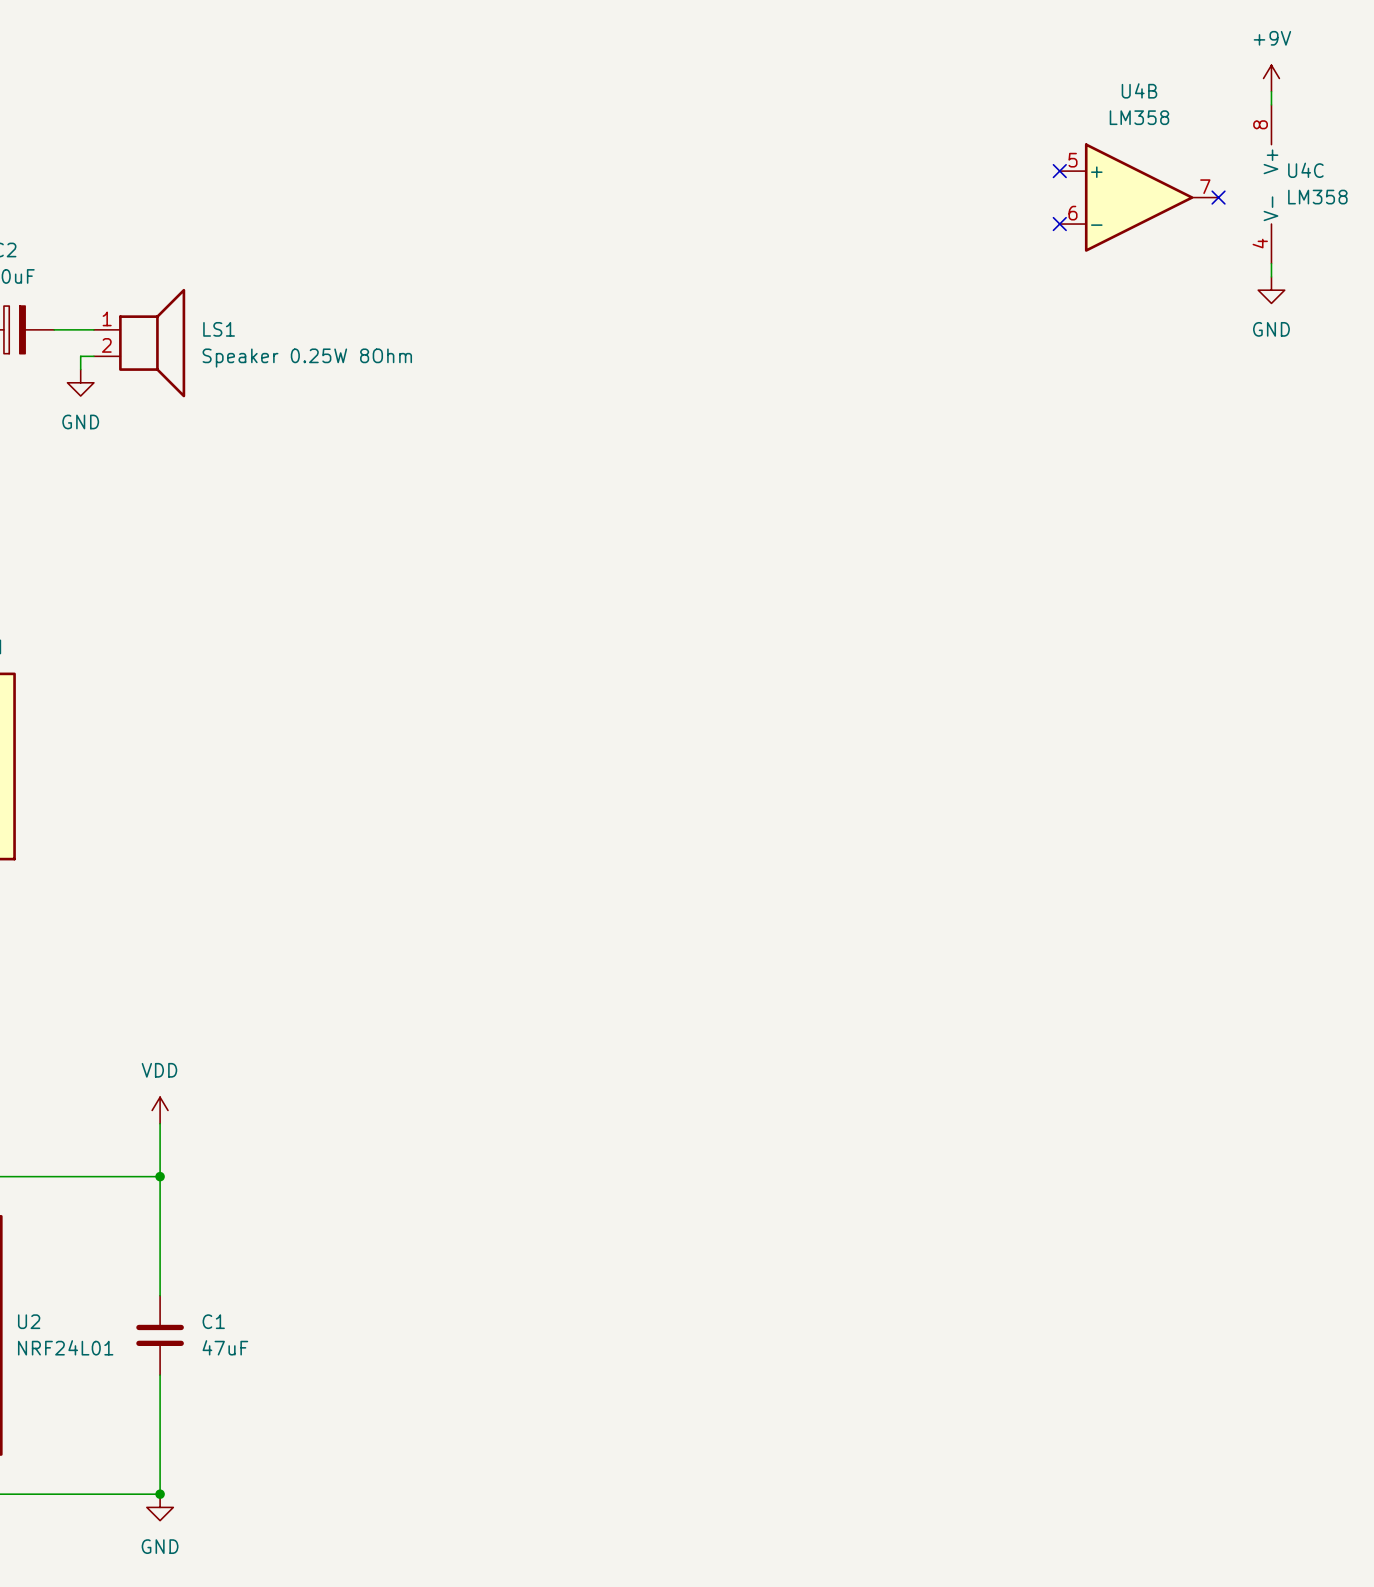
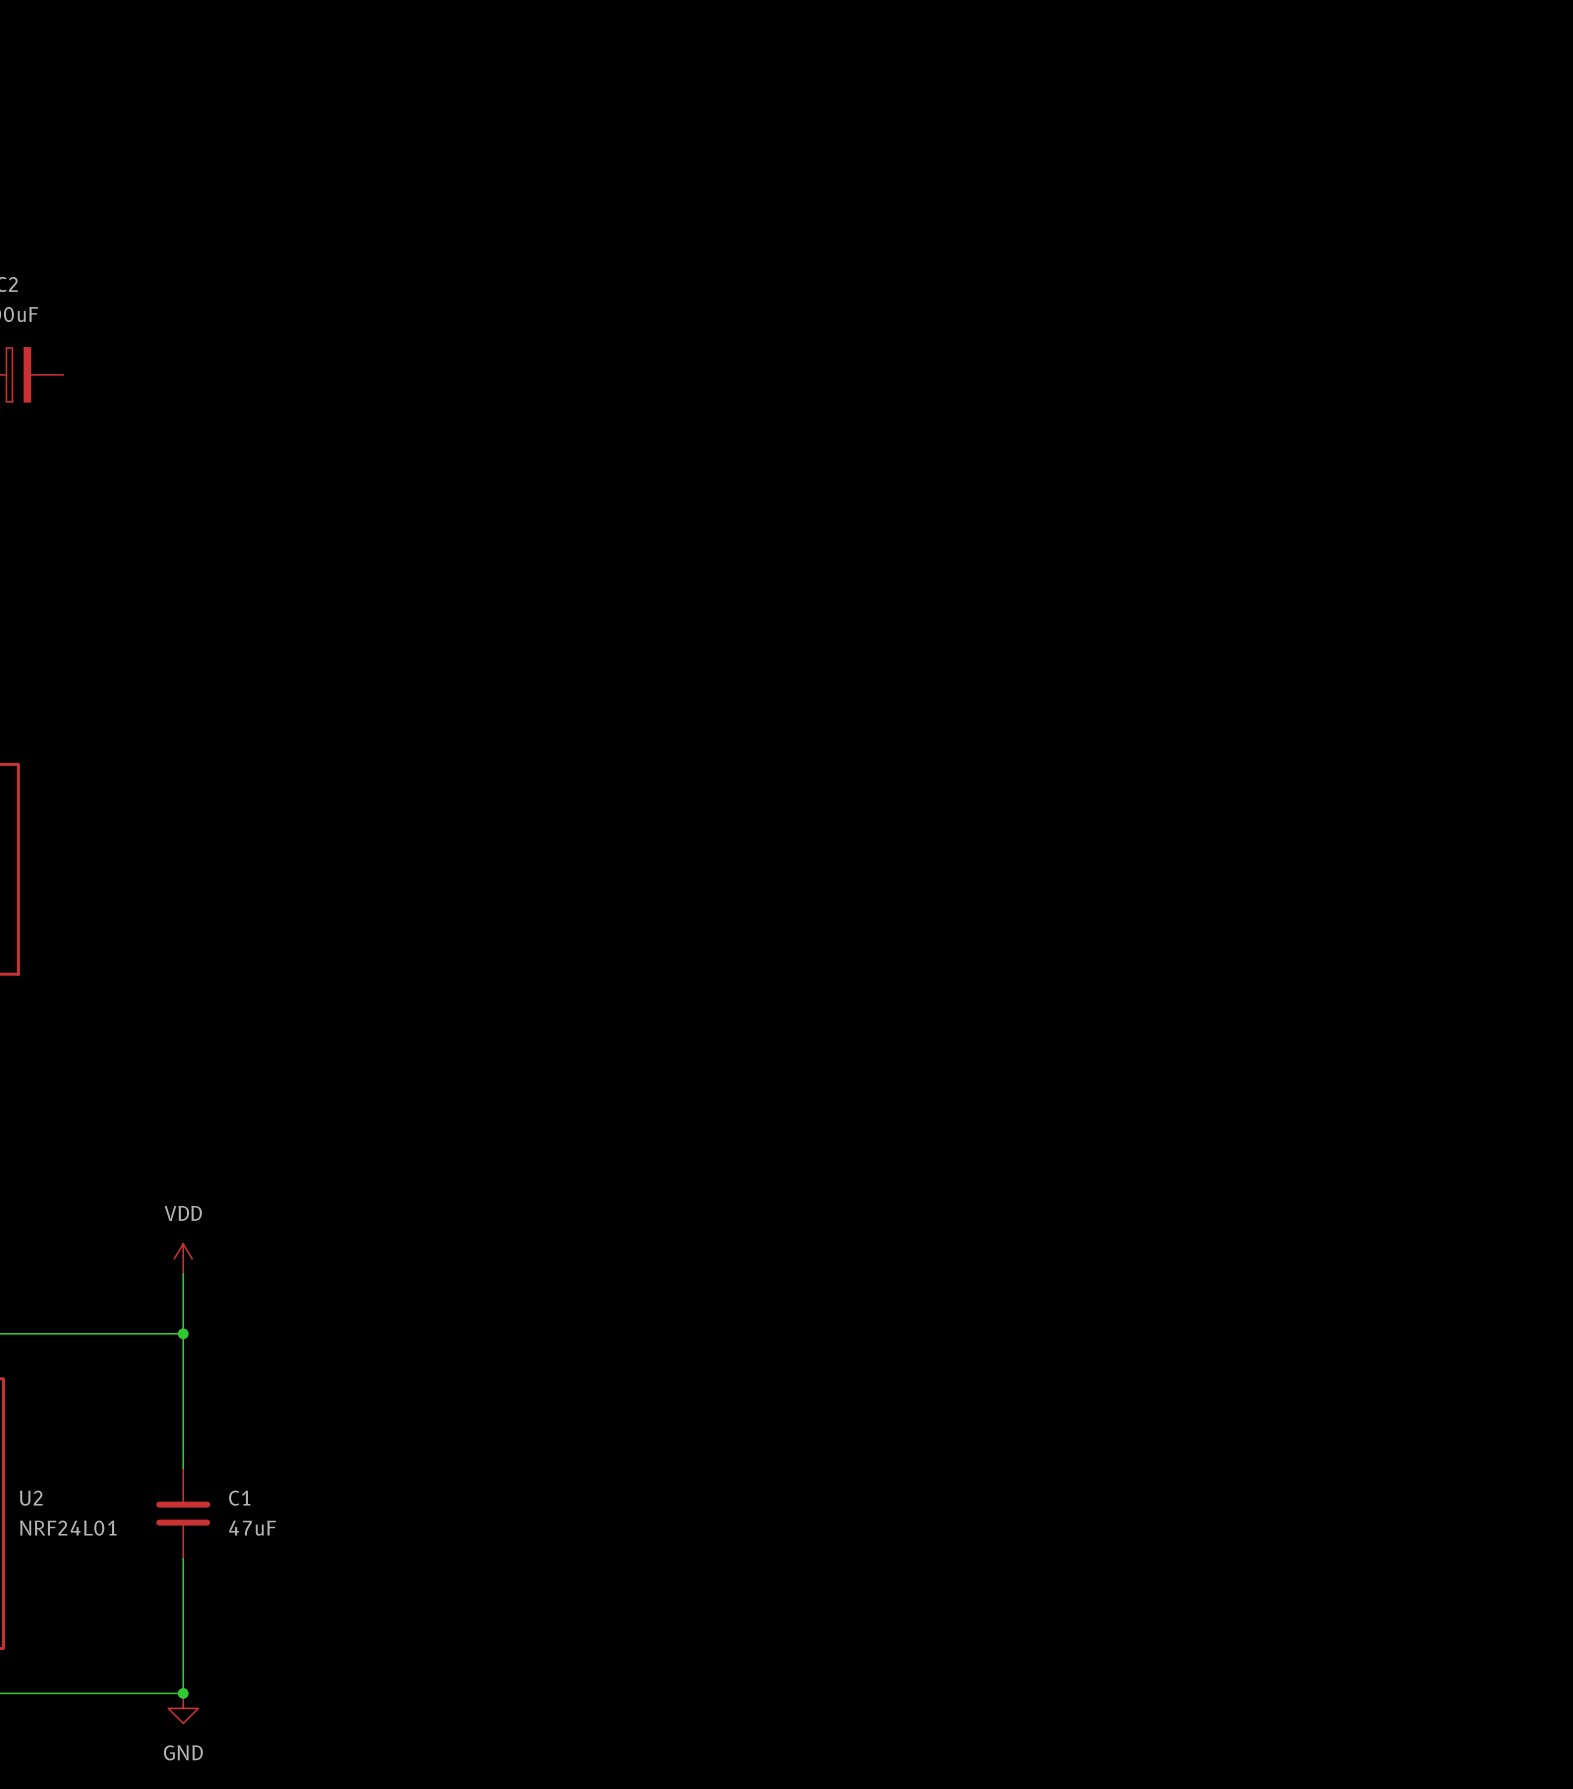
power symbol: +9V (1271, 78) -> none
wire: (1271, 91) (1271, 104) -> none
no-connect mark: (1059, 171) -> none
U4C: LM358 (1271, 184) -> none
U4B: LM358 (1139, 197) -> none
no-connect mark: (1218, 197) -> none
no-connect mark: (1059, 224) -> none
wire: (1271, 263) (1271, 276) -> none
power symbol: GND (1271, 290) -> none
wire: (54, 329) (93, 329) -> none
LS1: Speaker 0.25W 8Ohm (139, 343) -> none
wire: (93, 356) (80, 356) (80, 369) -> none
power symbol: GND (80, 382) -> none

